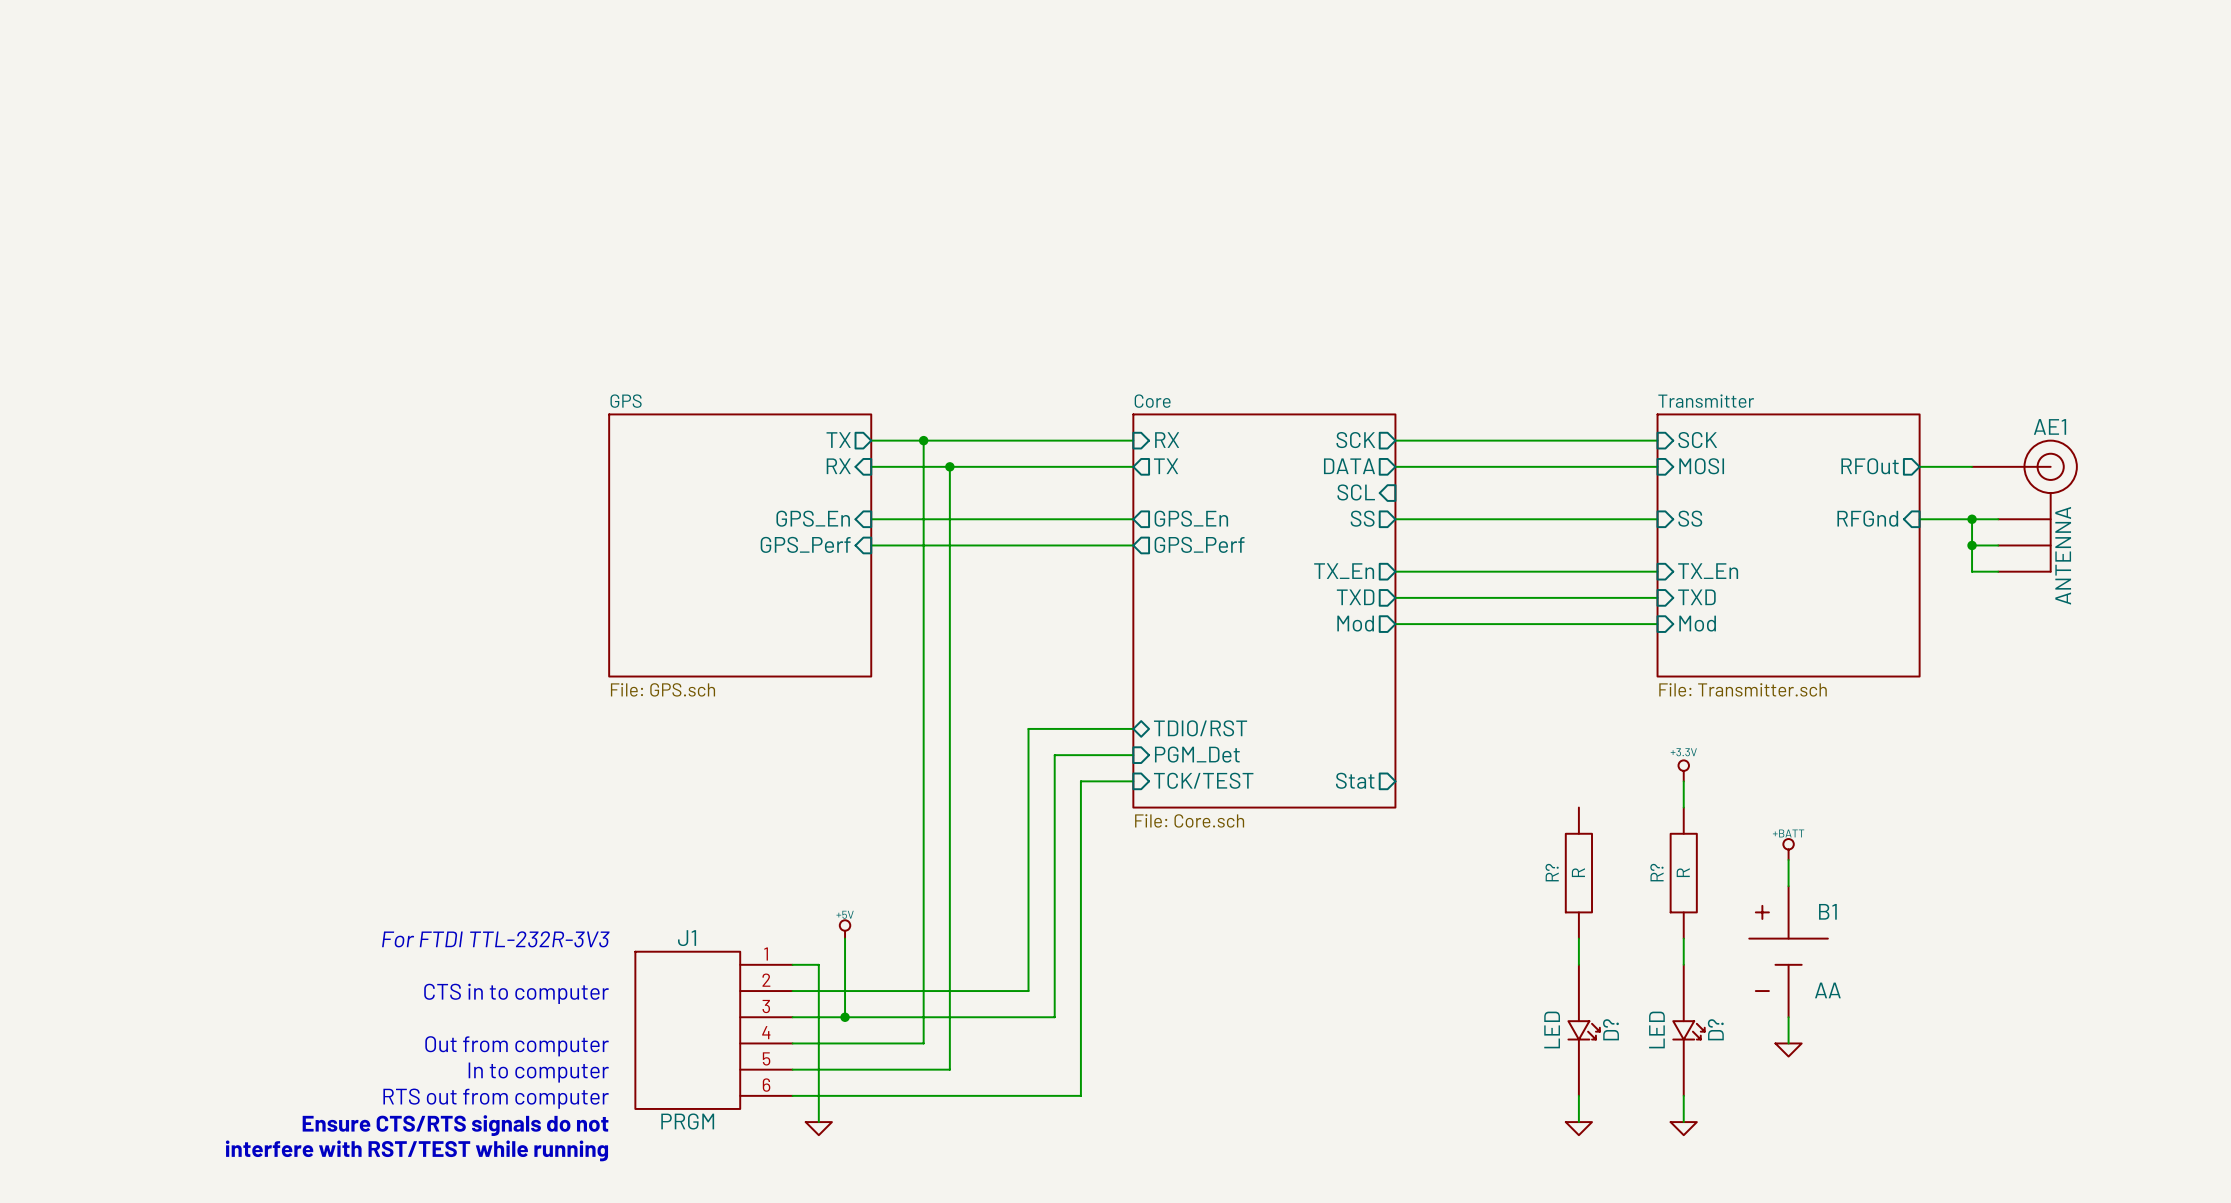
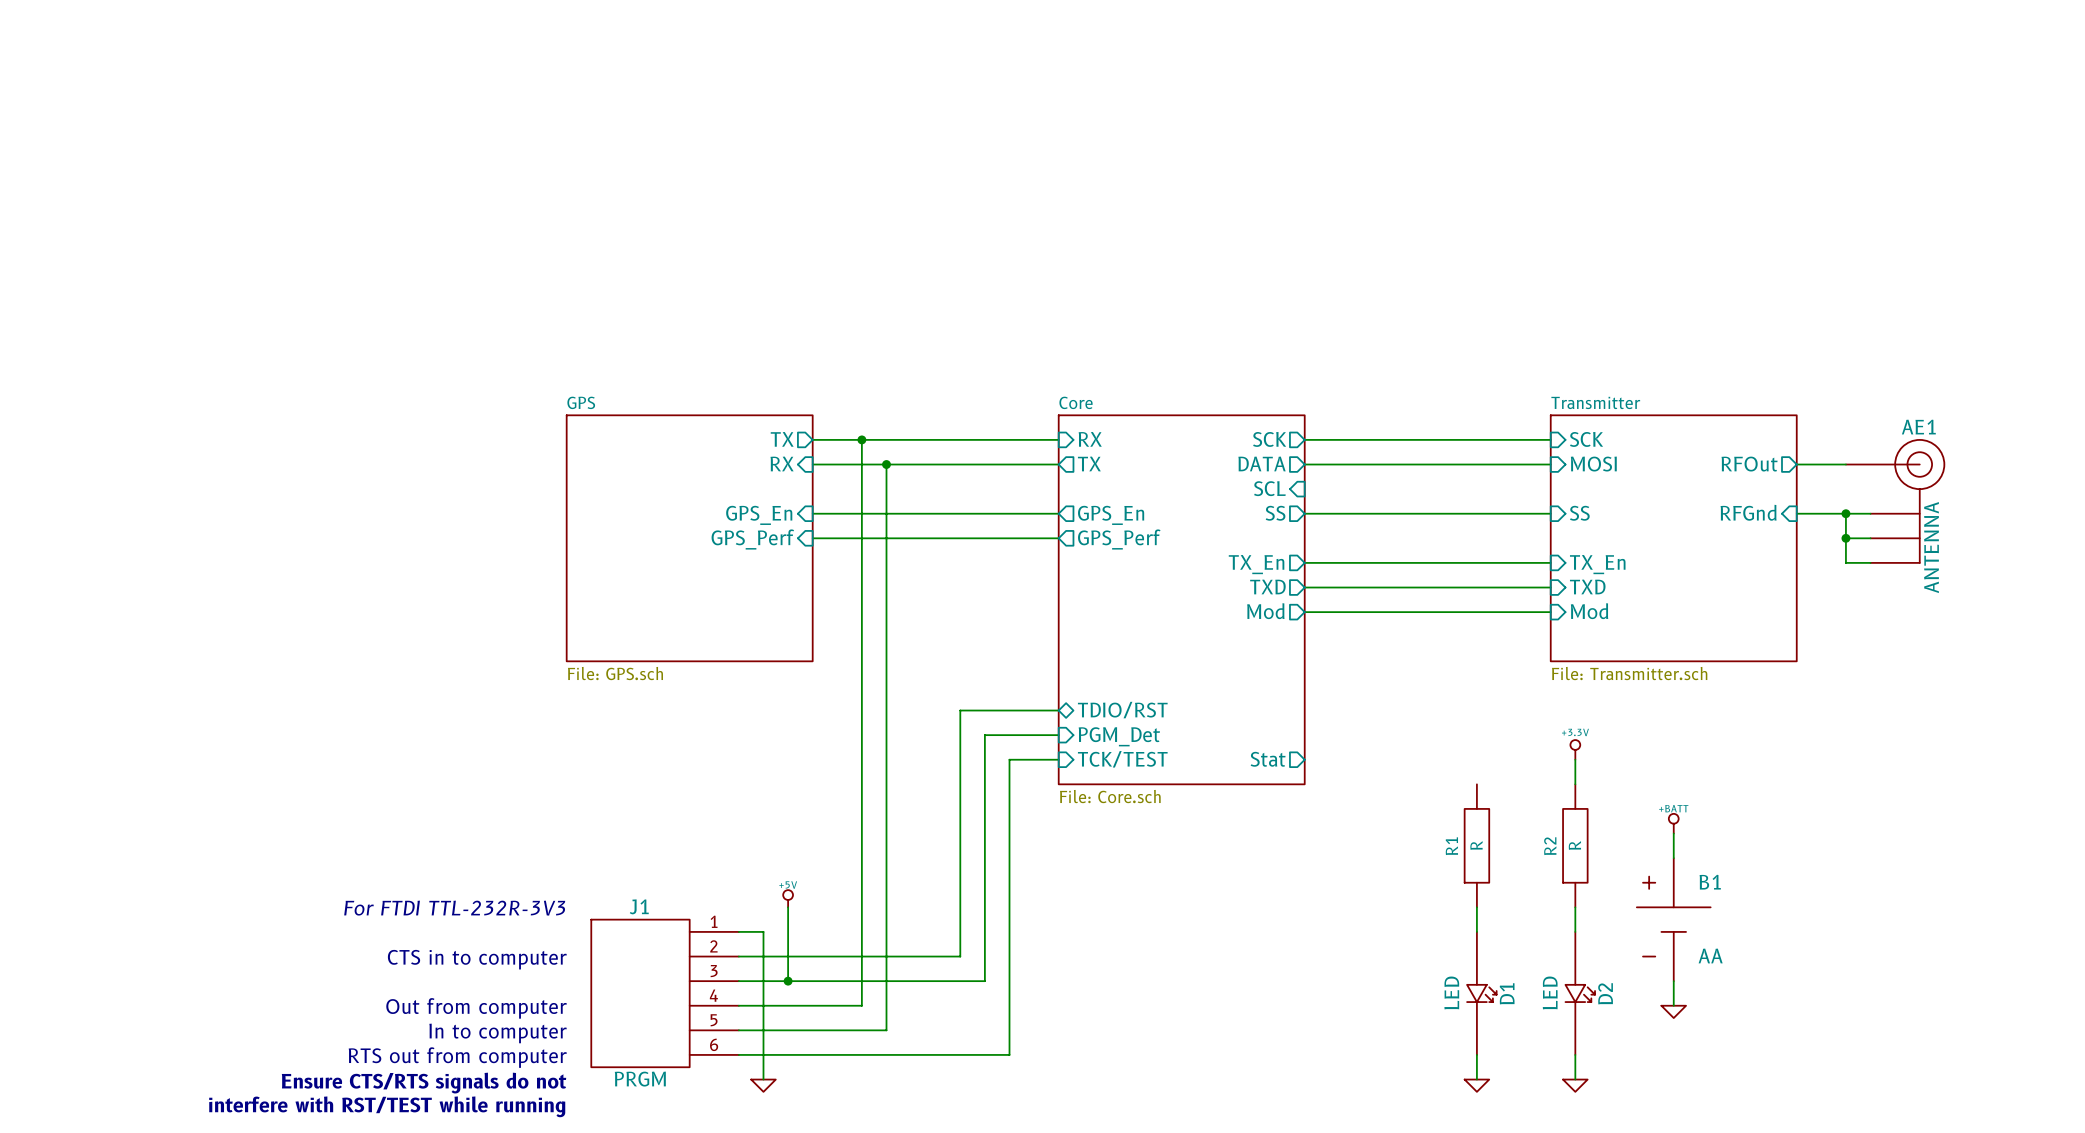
R? name: R? (1552, 872) -> R1 (1451, 846)
R? name: R? (1656, 872) -> R2 (1550, 846)
D? name: D? (1610, 1029) -> D1 (1507, 993)
D? name: D? (1715, 1029) -> D2 (1605, 993)

